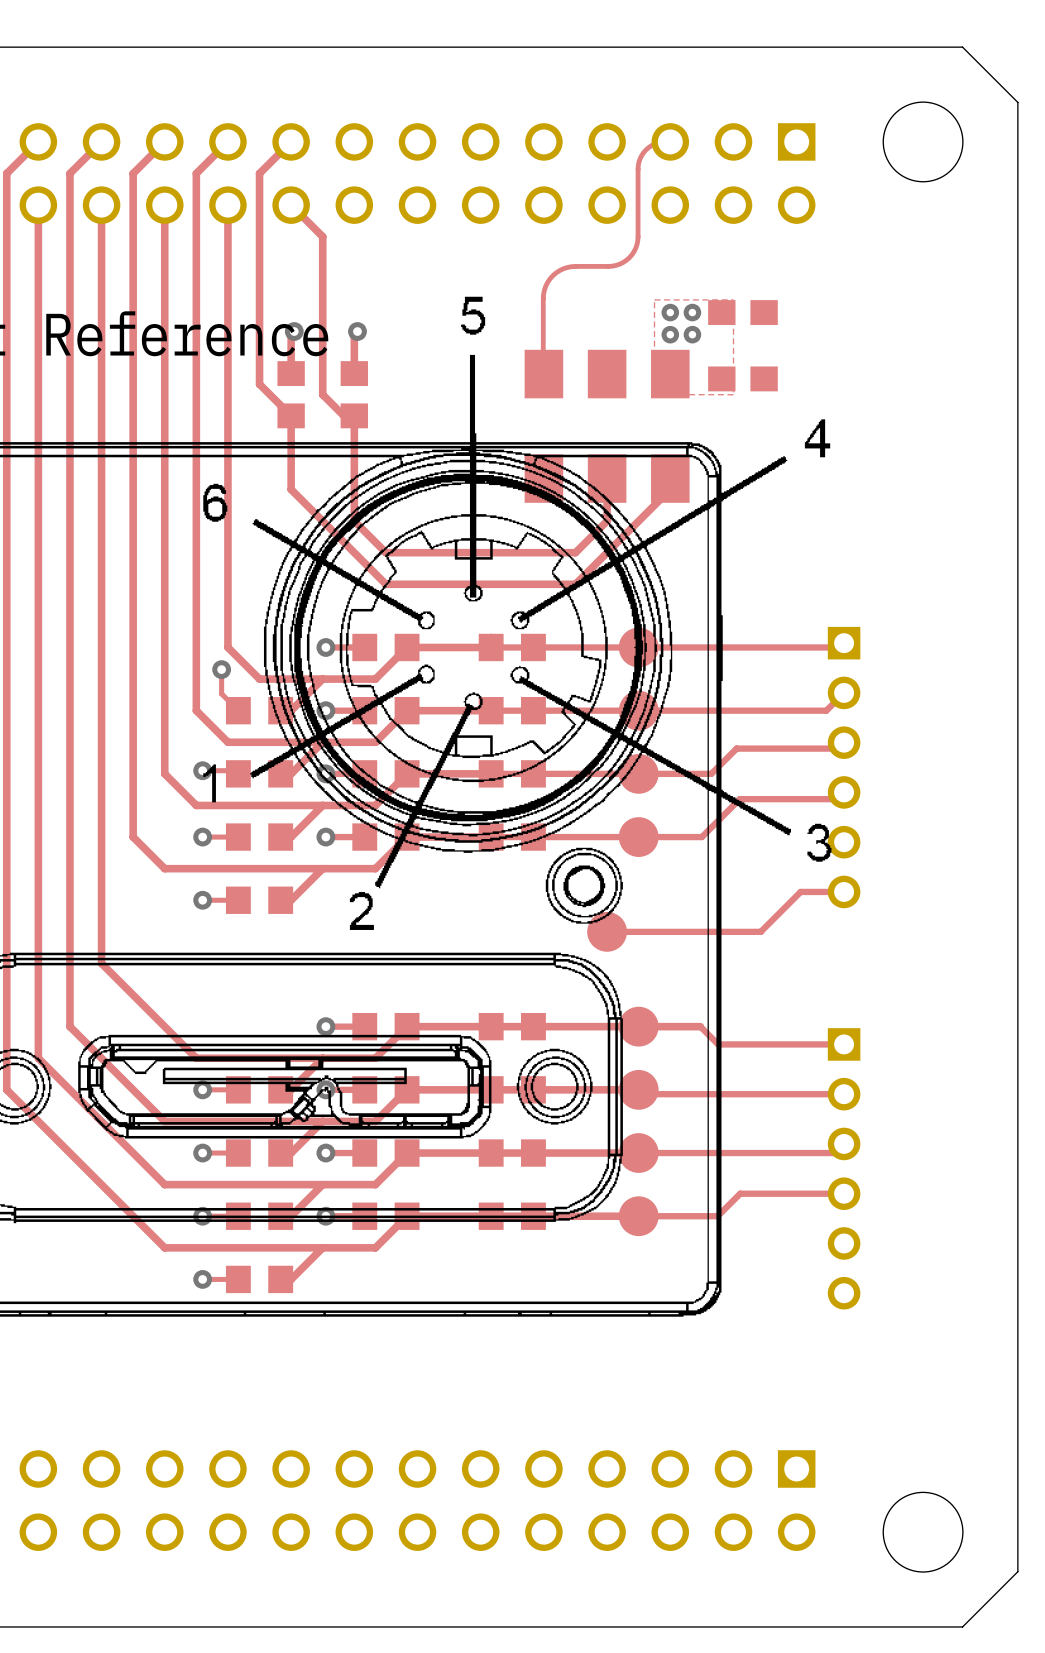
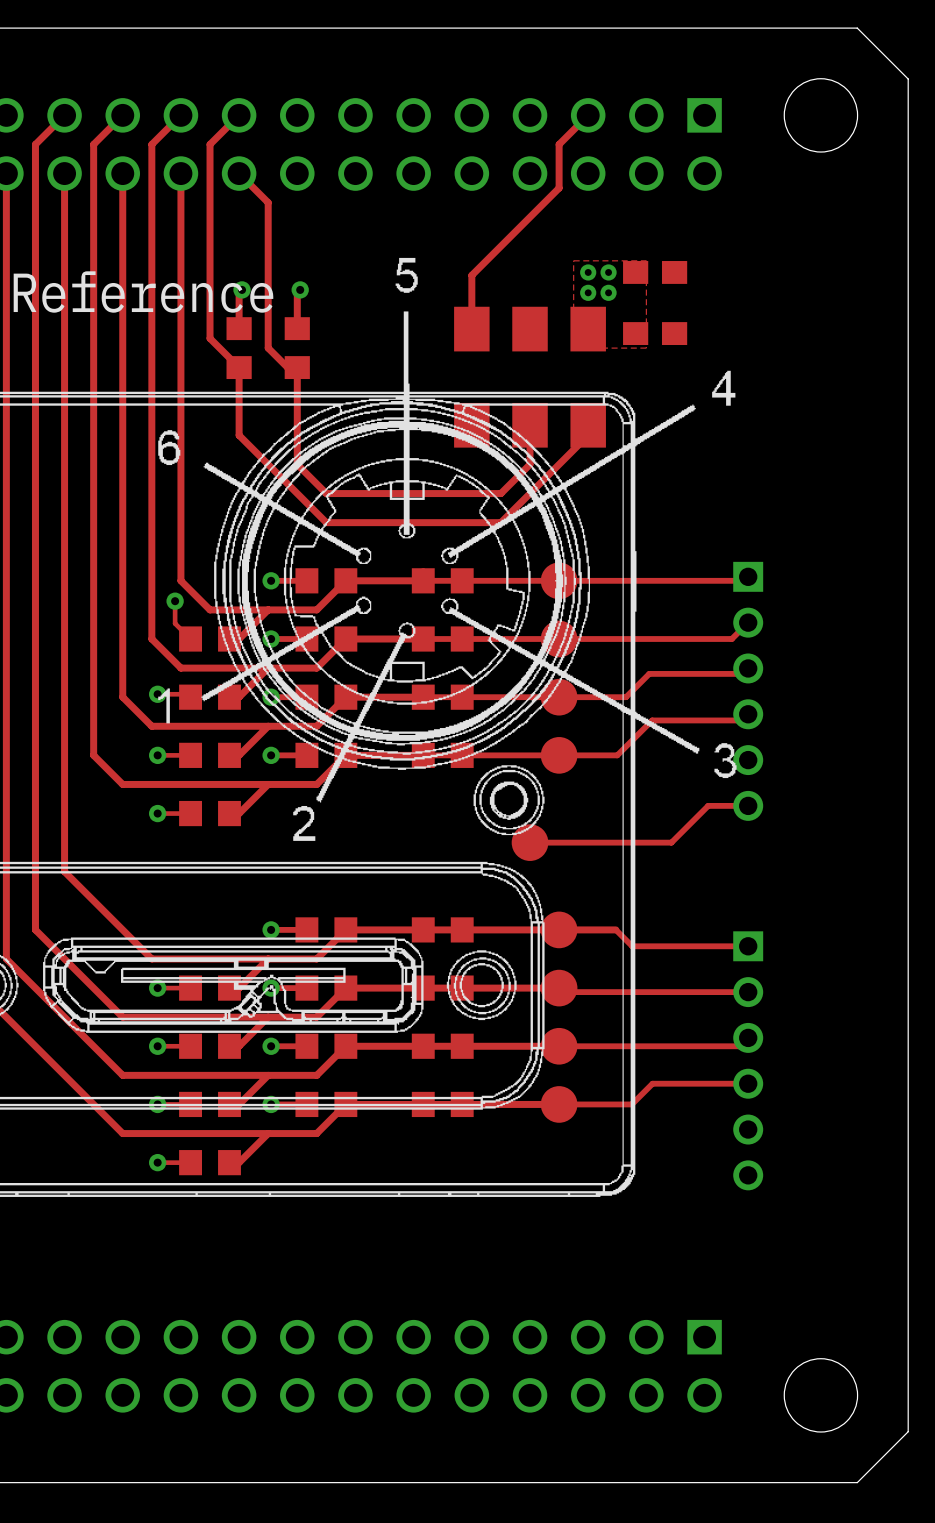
top track: (670, 141) (651, 145) (640, 158) (638, 169) (637, 240) (631, 254) (623, 262) (612, 266) (567, 267) (555, 273) (547, 282) (543, 298) (543, 374) -> (588, 115) (559, 144) (559, 188) (471, 275) (471, 329)

